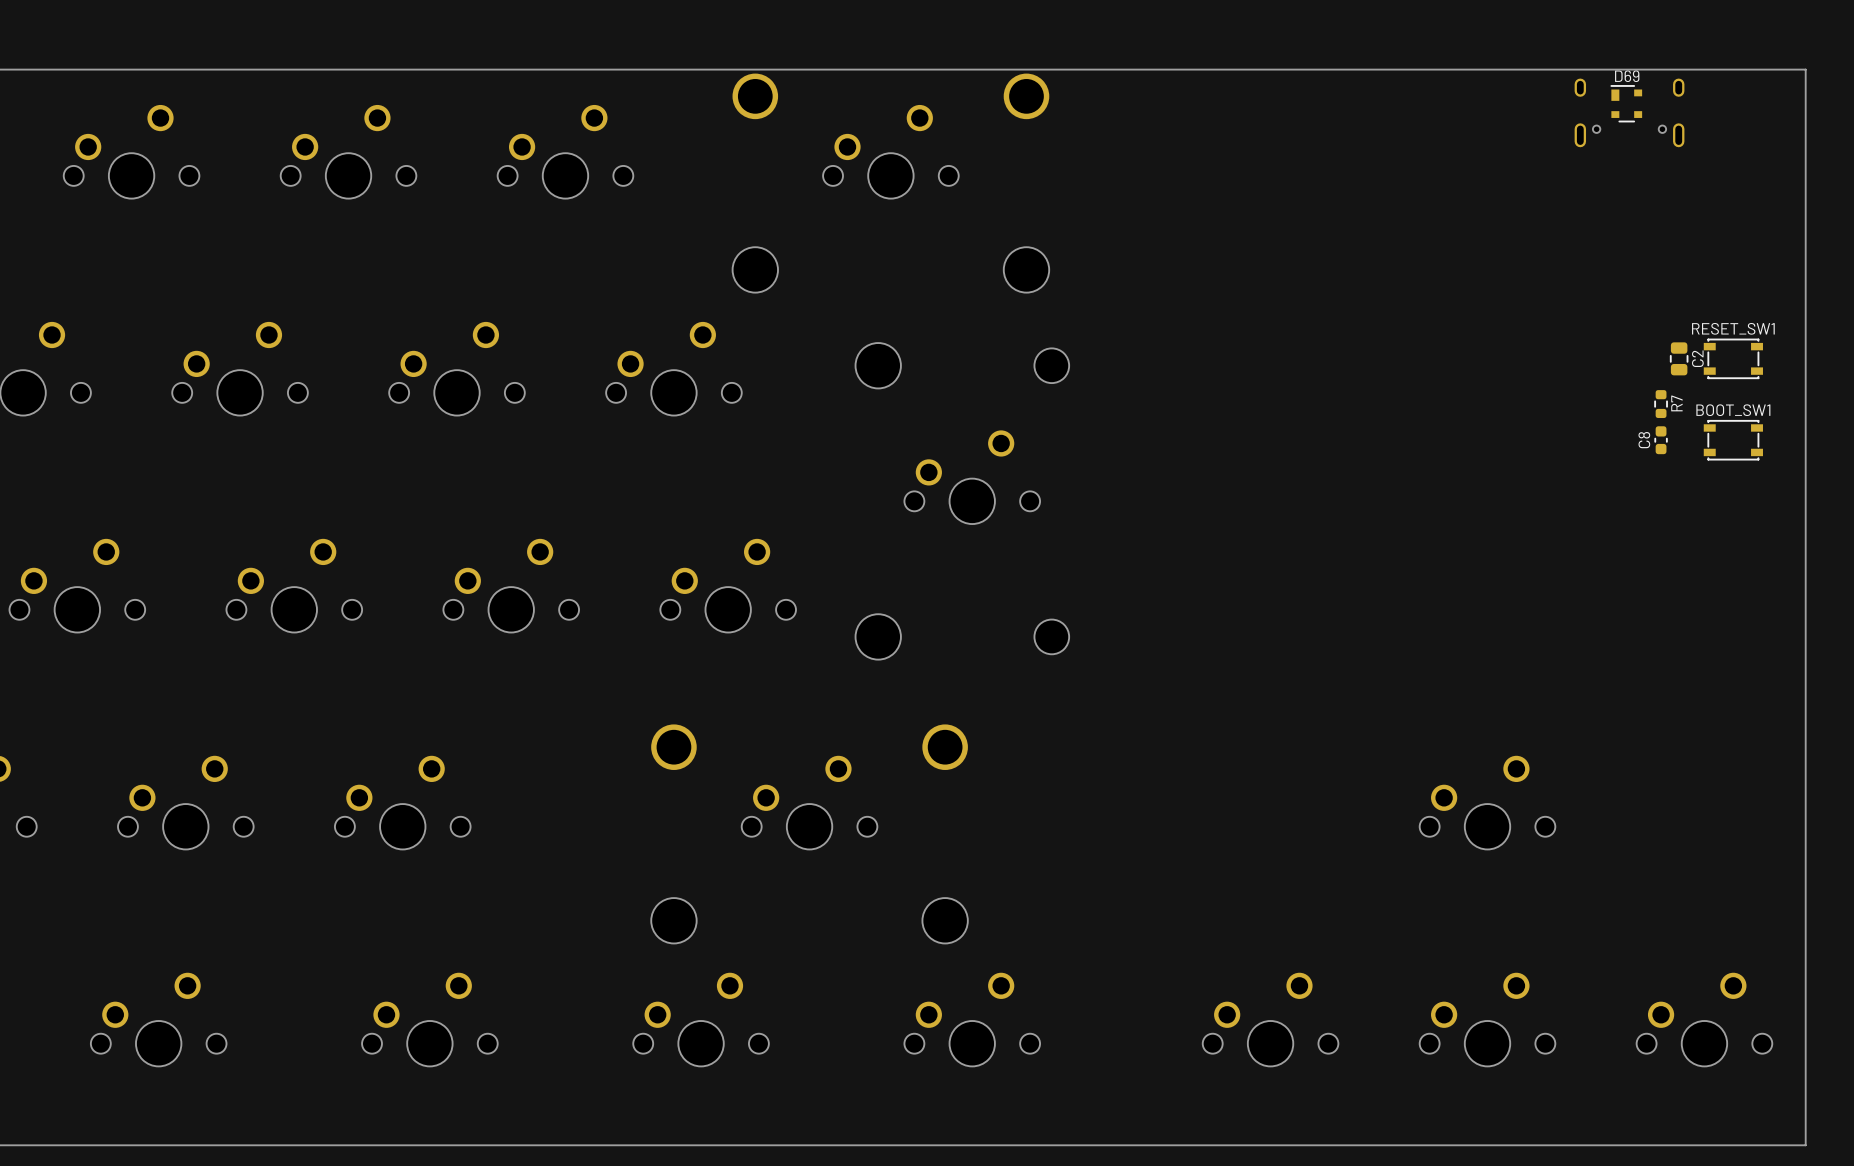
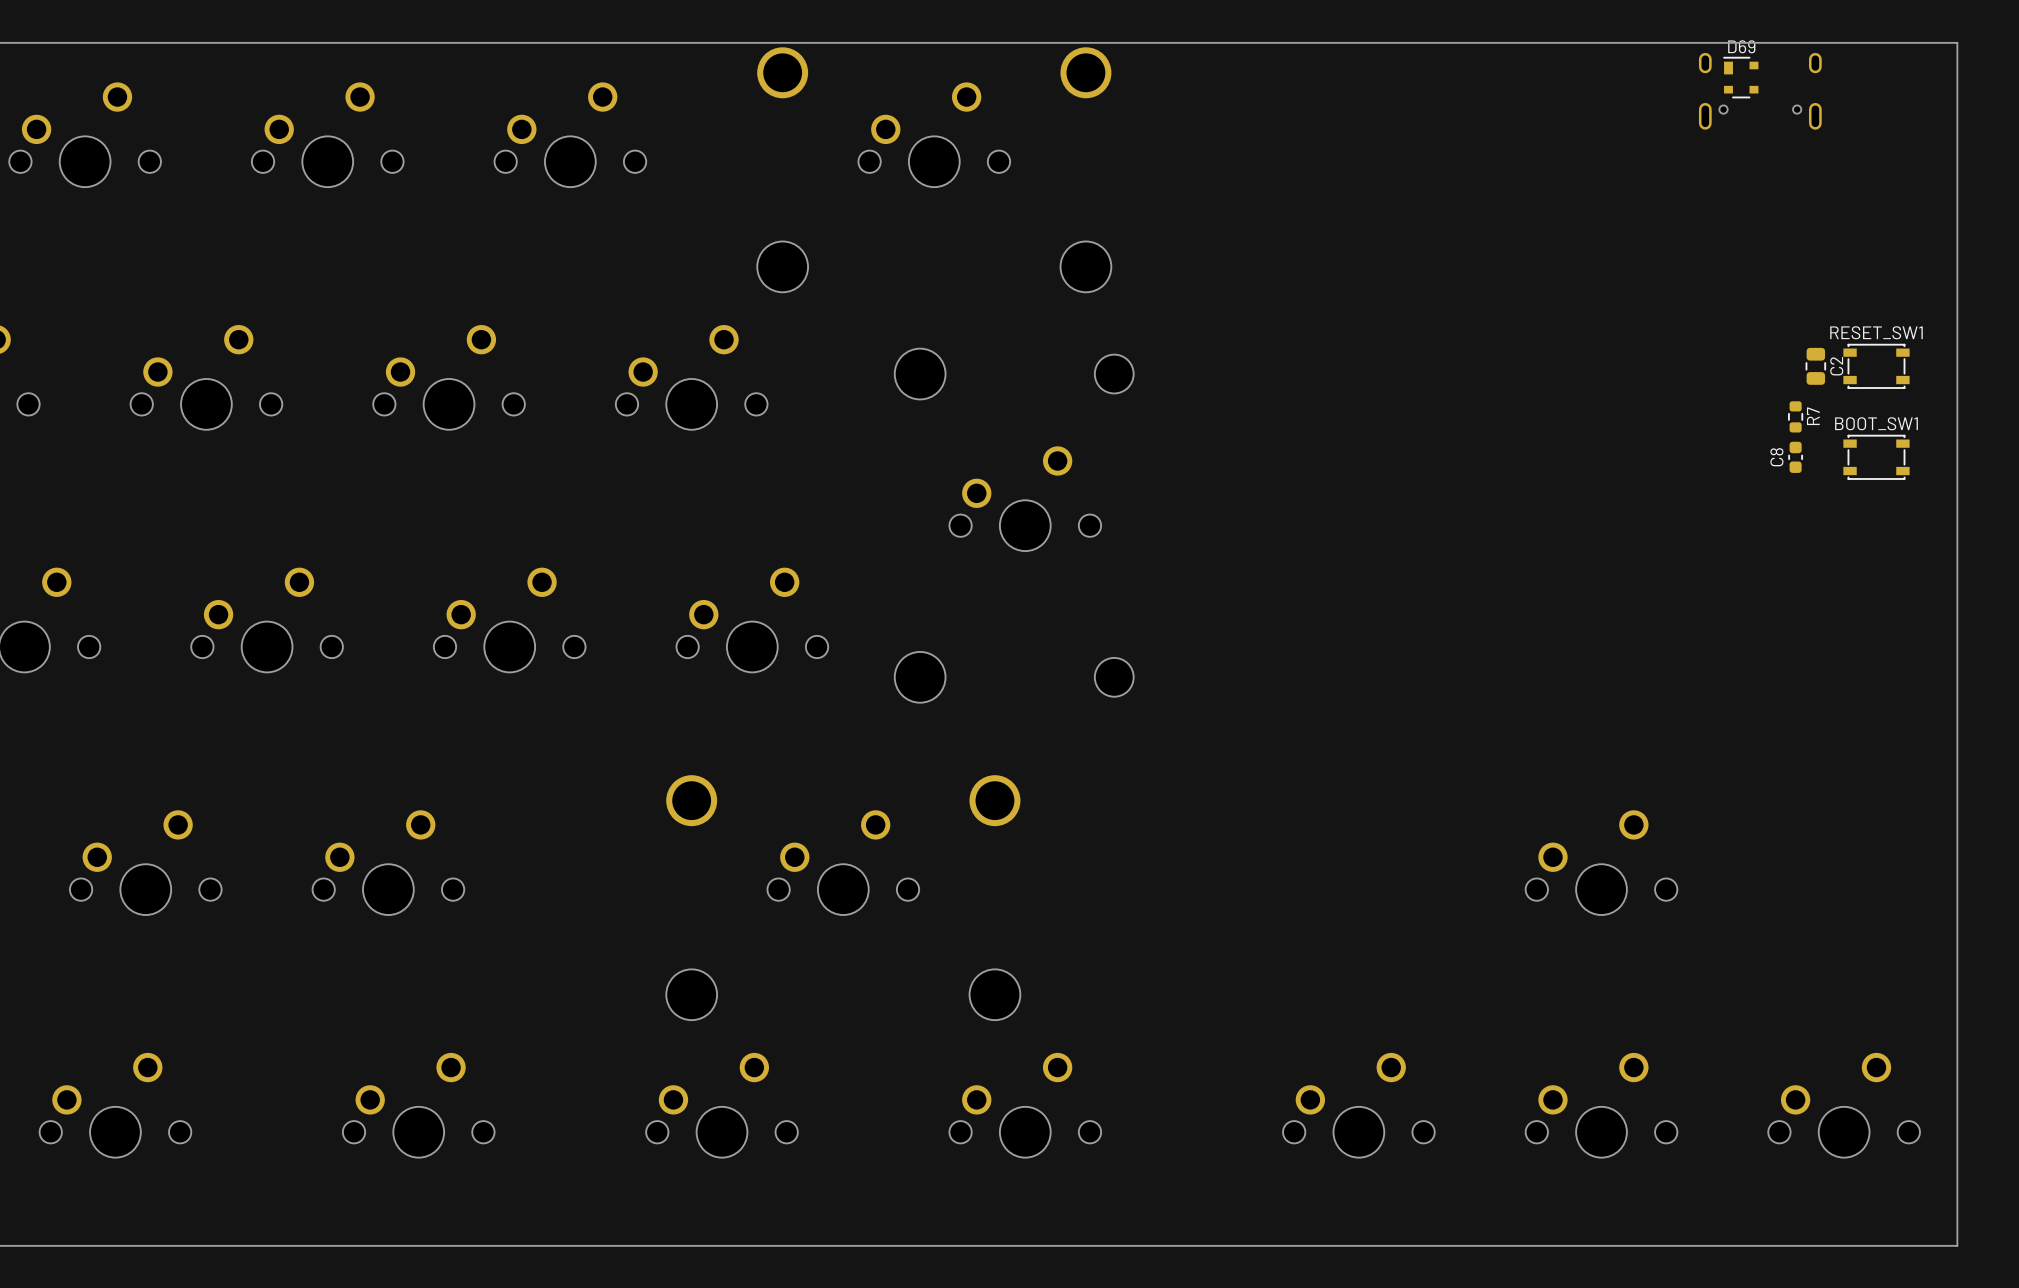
D69 position: (1626, 103) -> (1740, 77)

